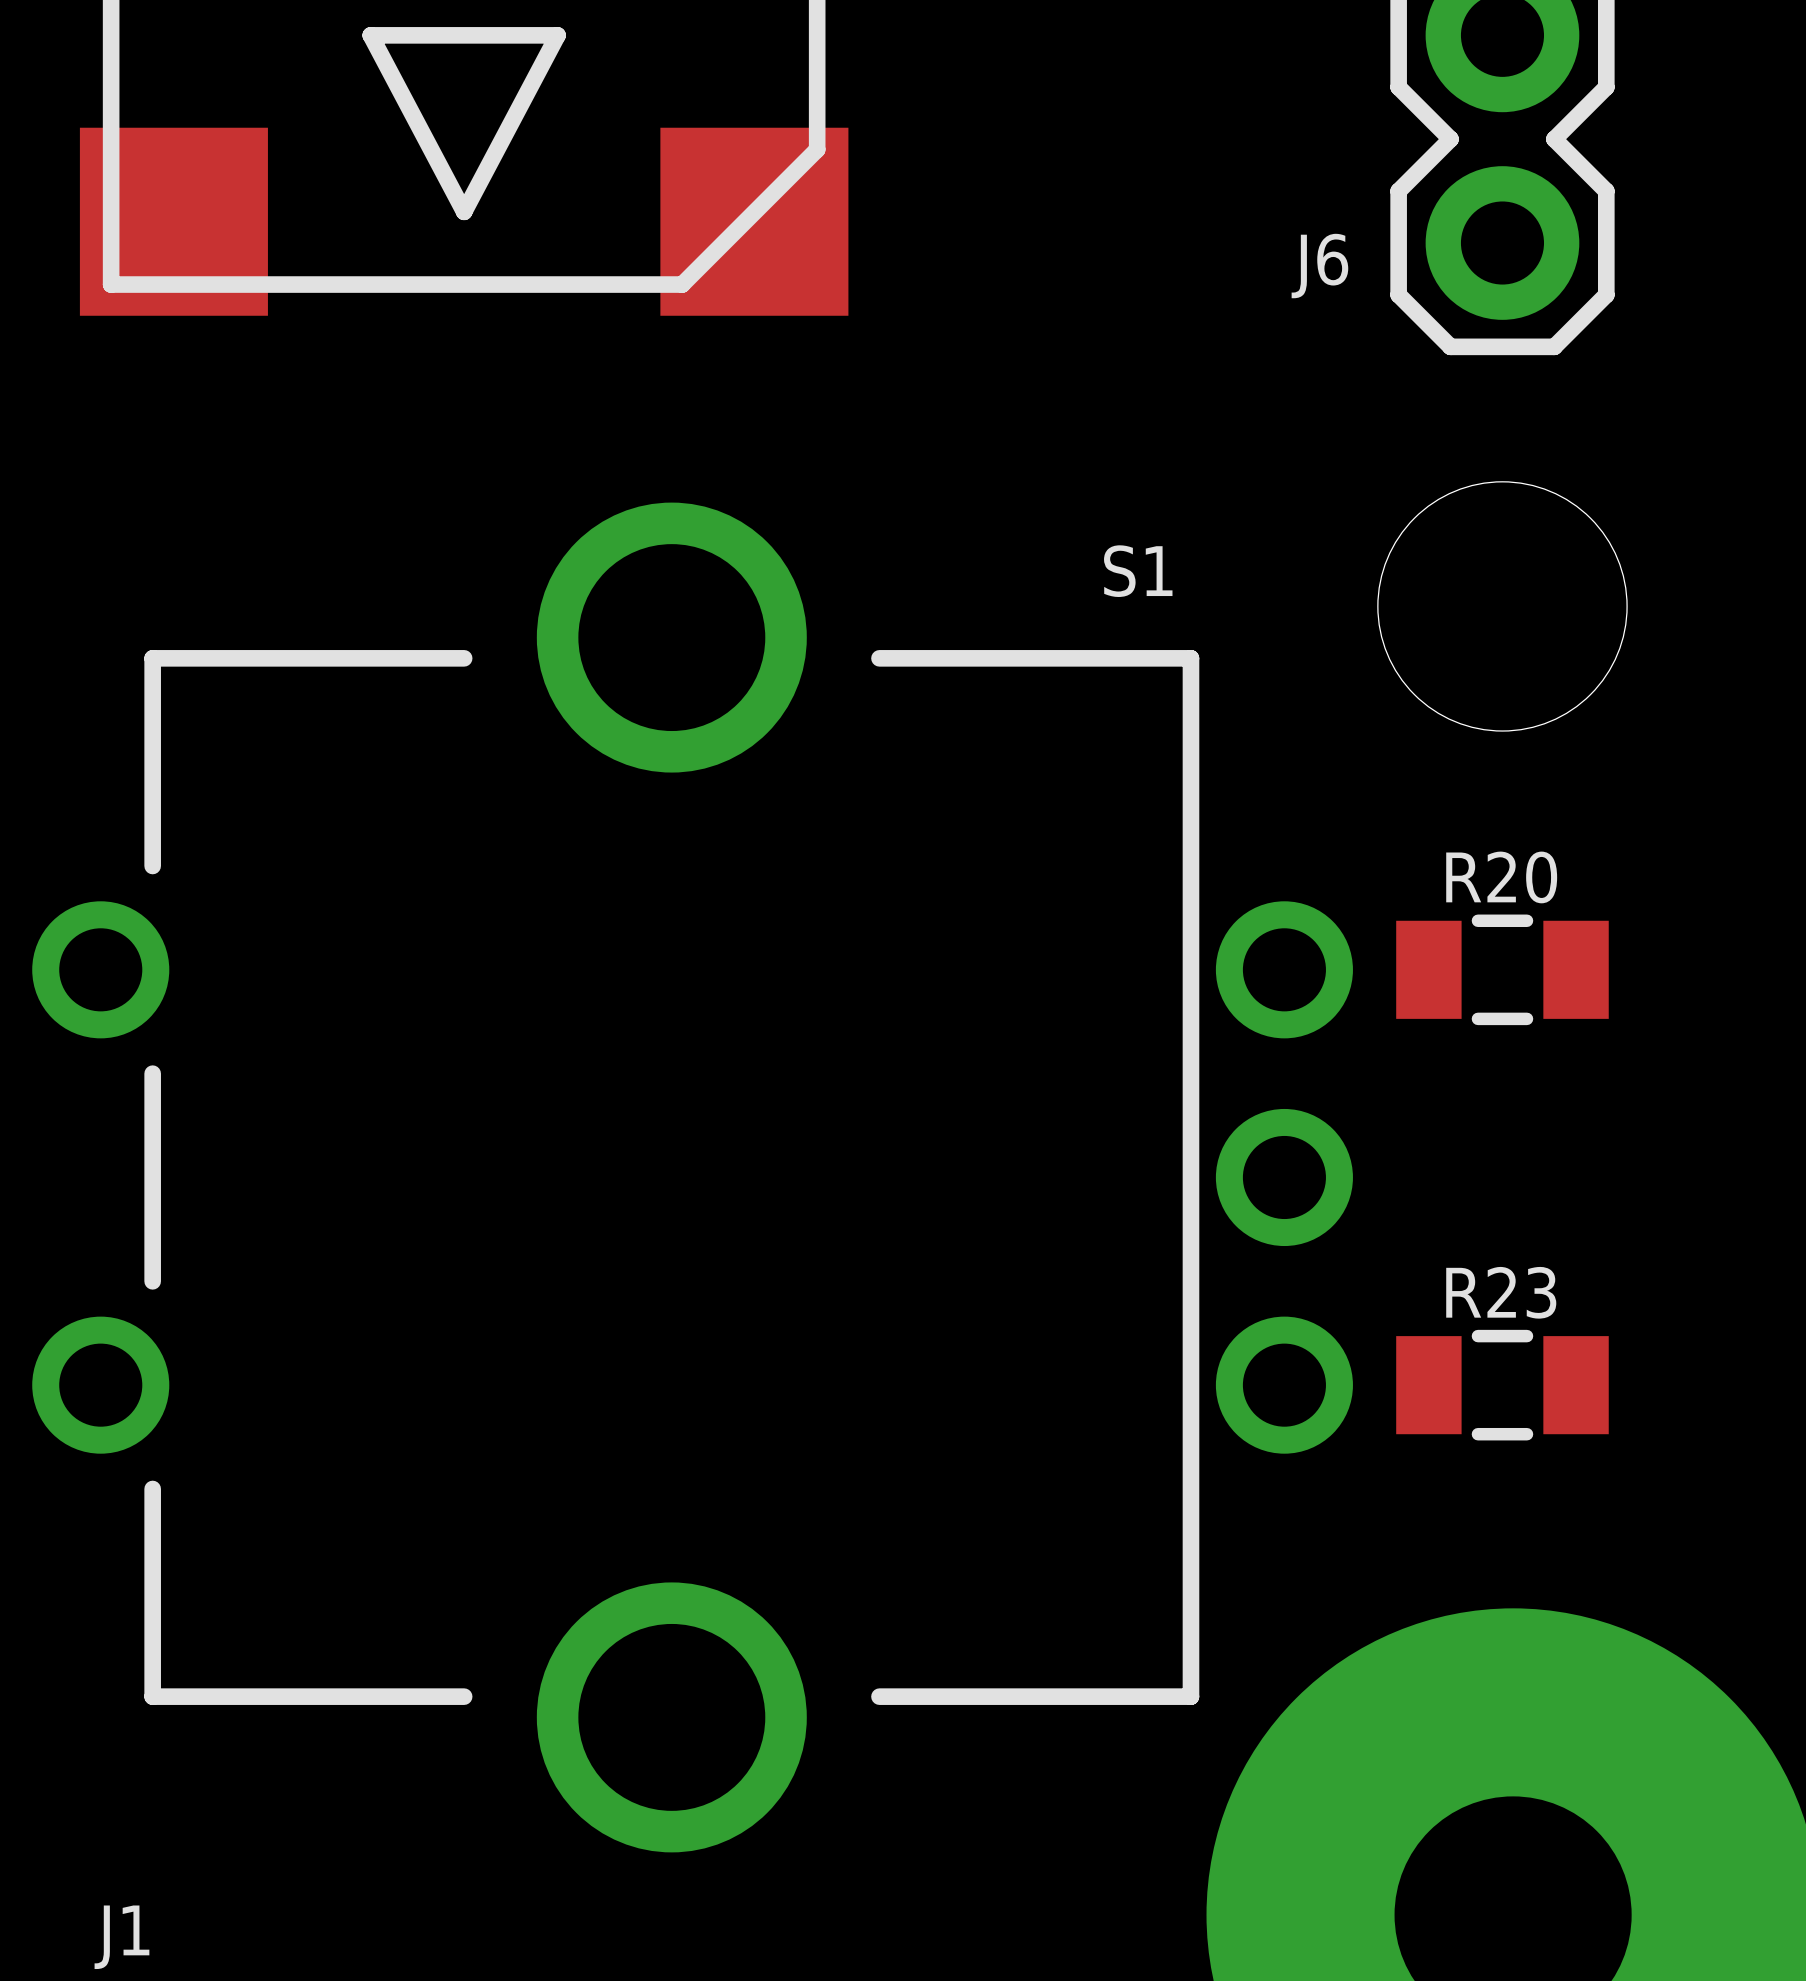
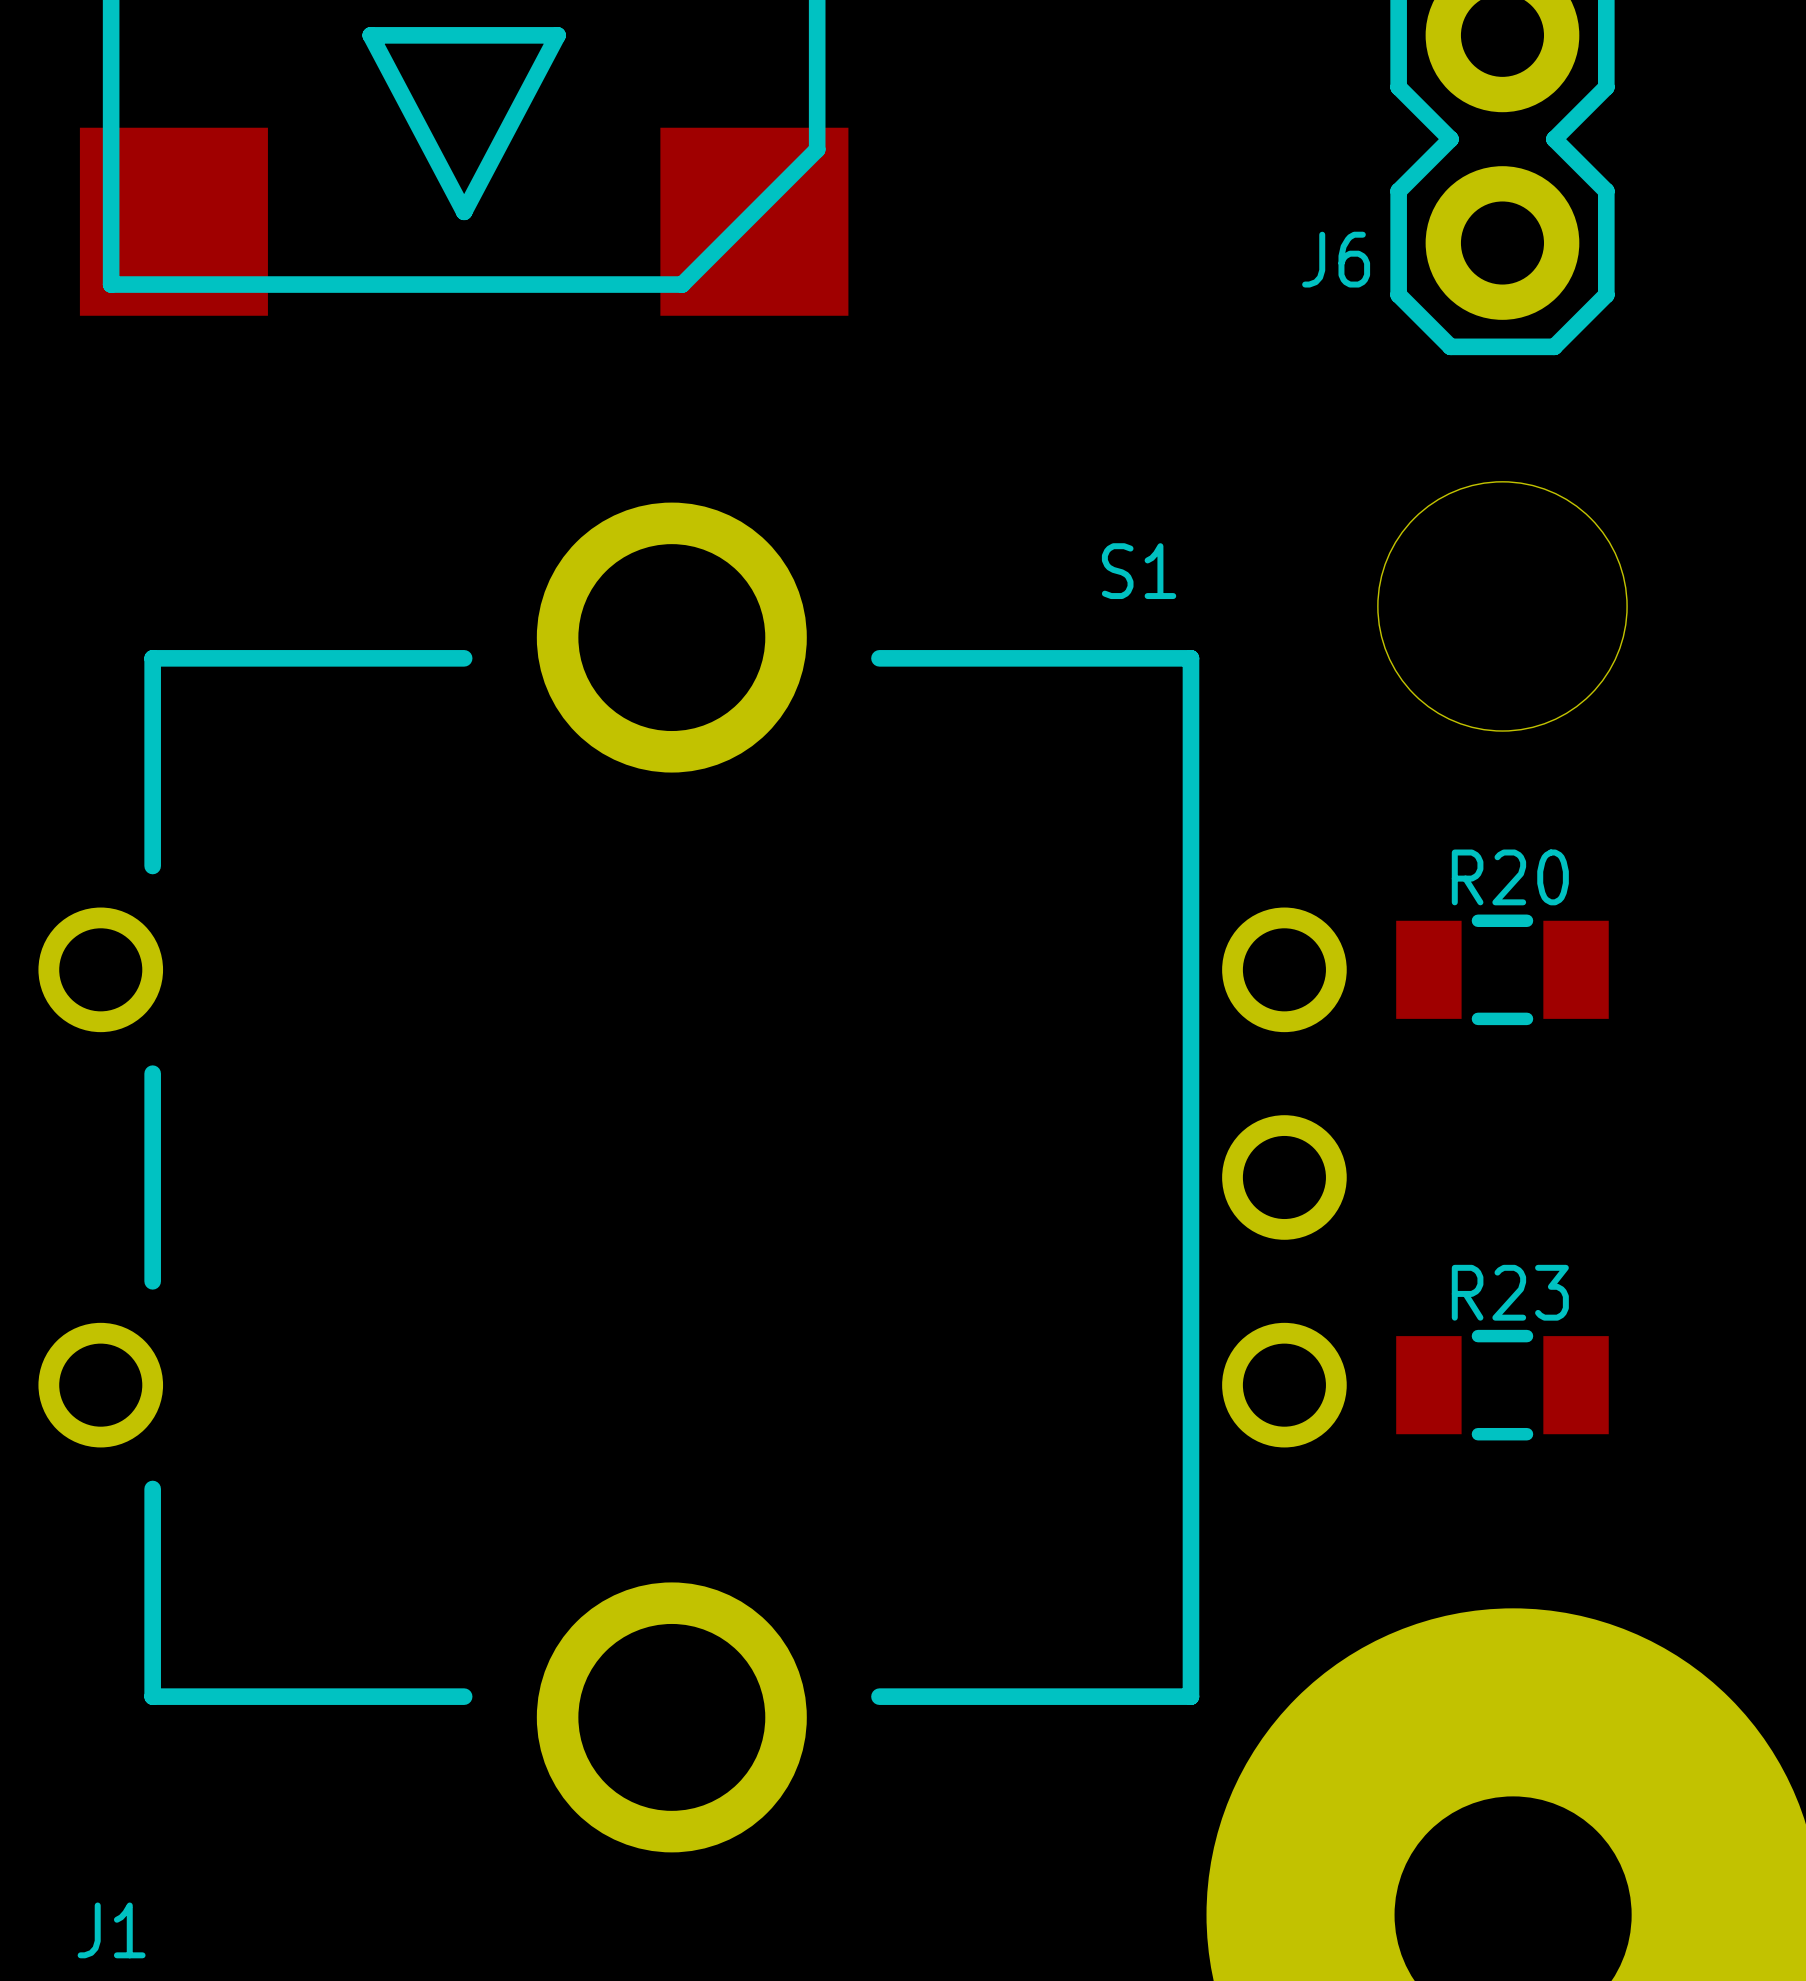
S1 footprint: [32, 502, 1353, 1853] -> [38, 502, 1347, 1853]

